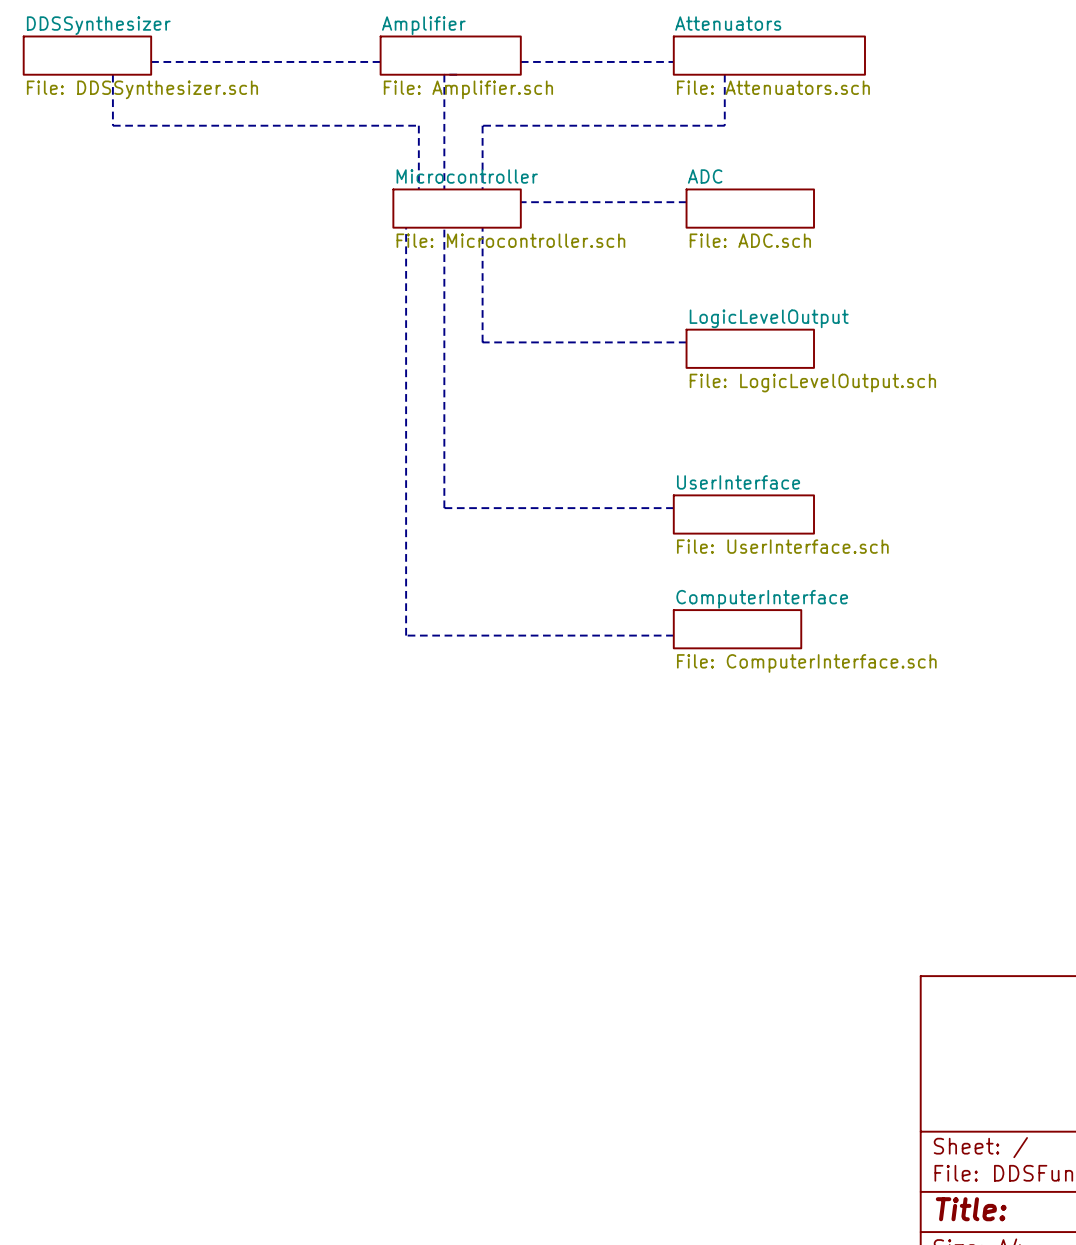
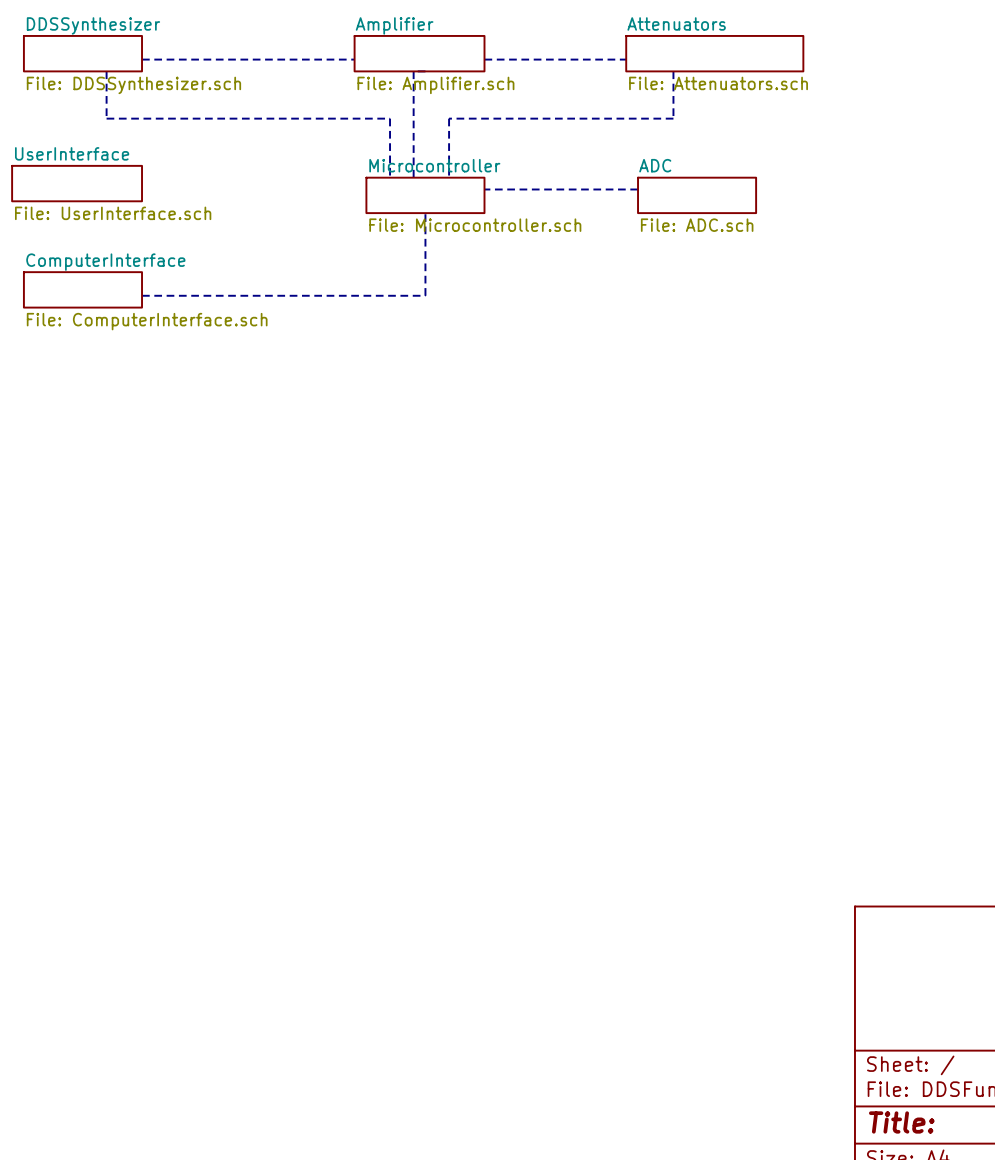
sheet UserInterface: none -> File: UserInterface.sch (77, 183)
line: (406, 227) (406, 635) (673, 635) -> none
line: (444, 227) (444, 508) (673, 508) -> none
line: none -> (425, 213) (425, 295) (142, 295)
line: (482, 227) (482, 342) (686, 342) -> none
sheet ComputerInterface: none -> File: ComputerInterface.sch (82, 289)
sheet LogicLevelOutput: File: LogicLevelOutput.sch (750, 348) -> none
sheet UserInterface: File: UserInterface.sch (743, 514) -> none
sheet ComputerInterface: File: ComputerInterface.sch (737, 629) -> none

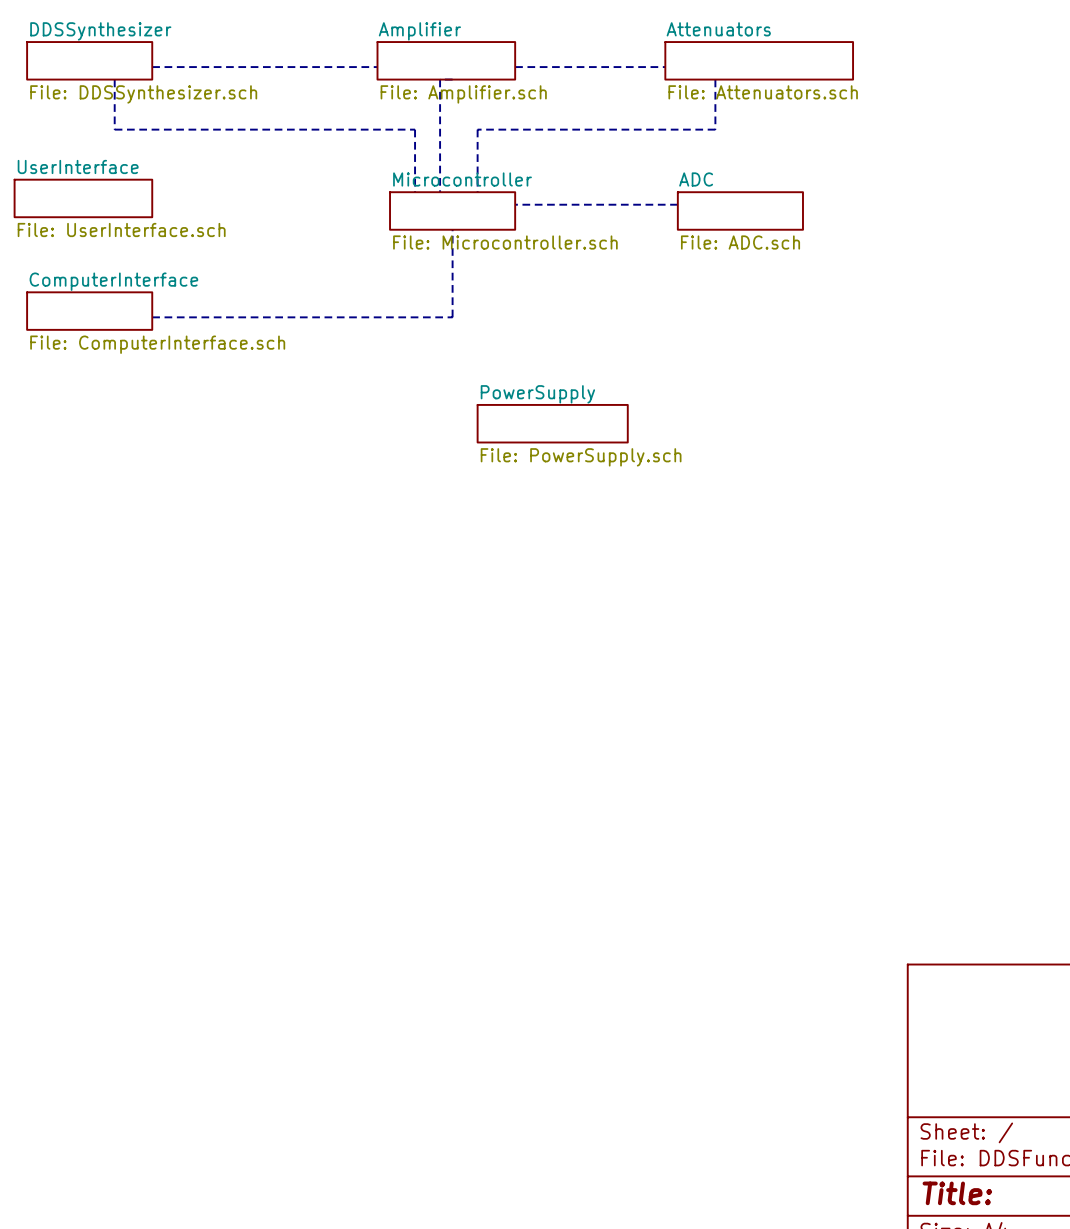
sheet PowerSupply: none -> File: PowerSupply.sch (552, 423)

